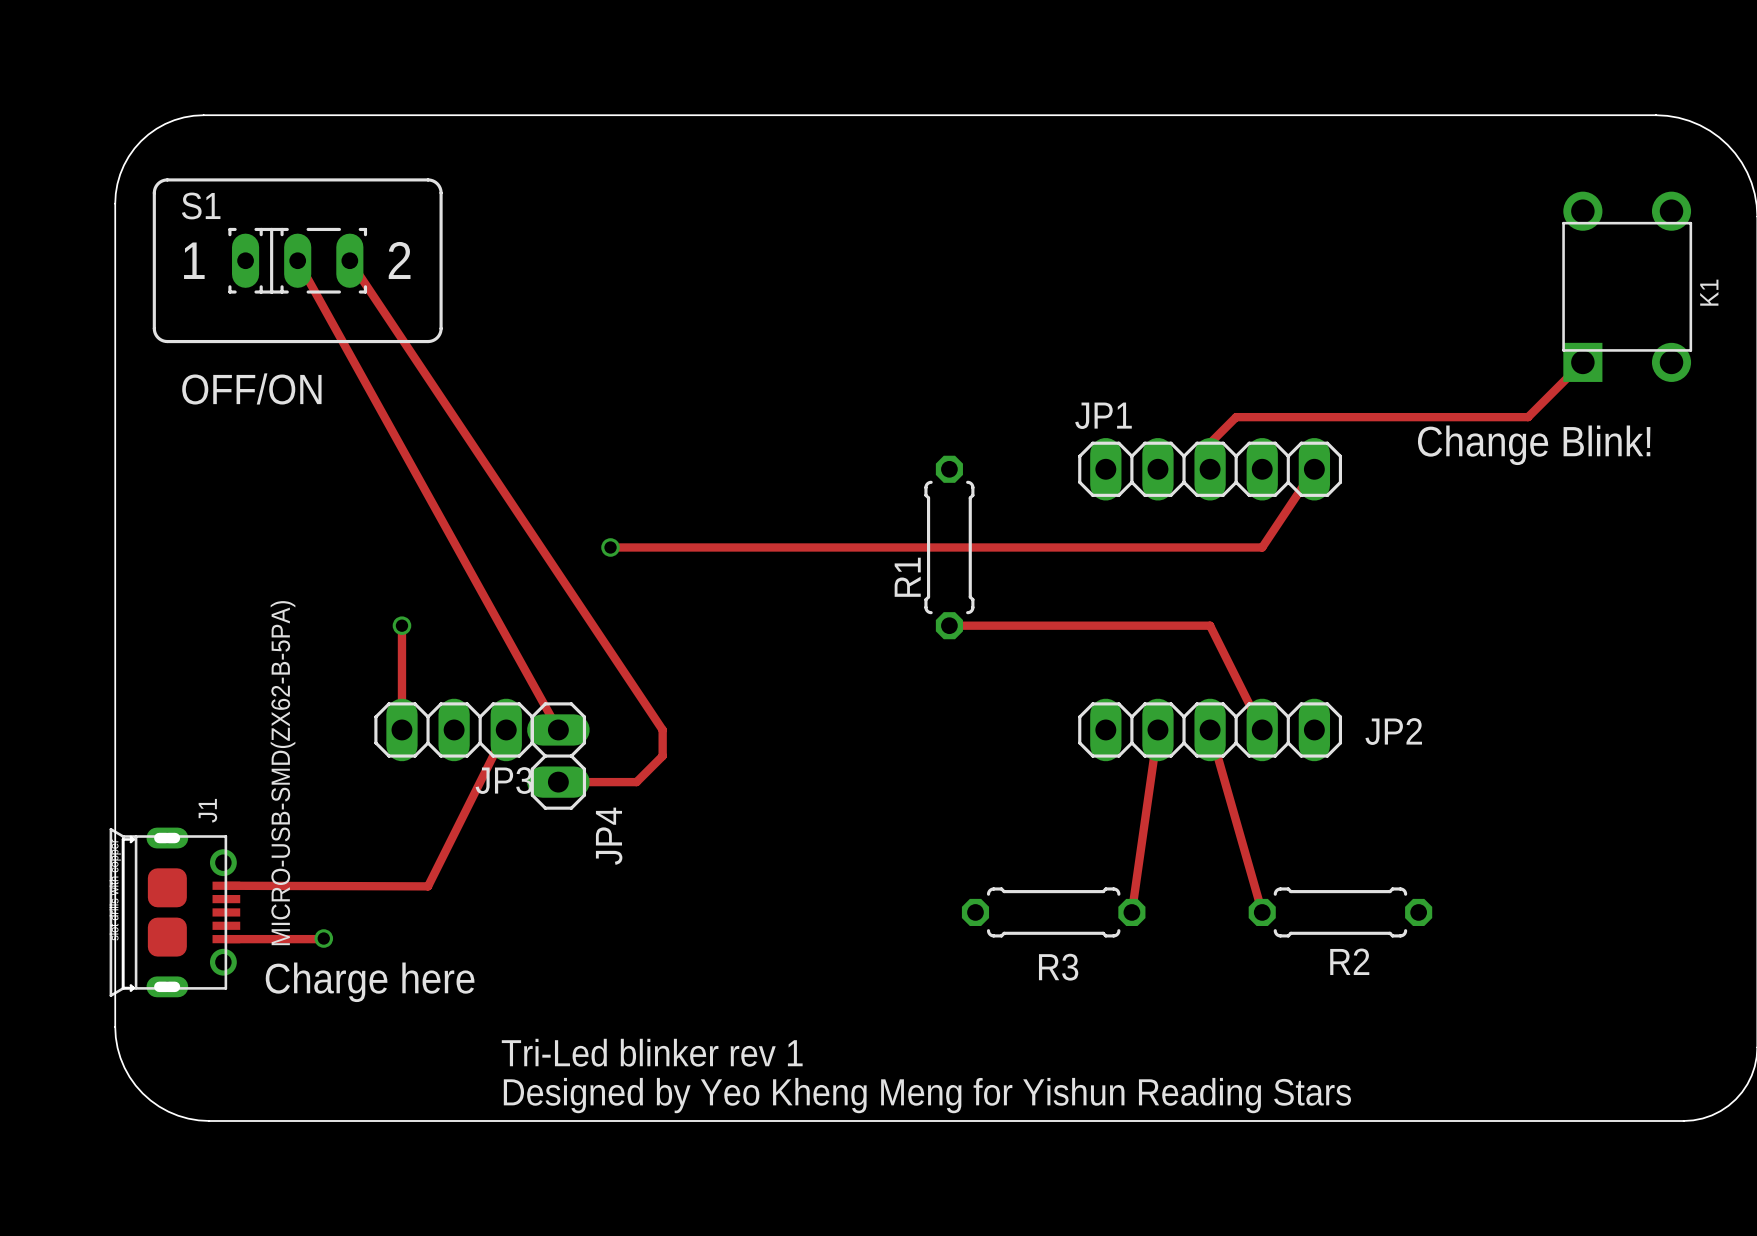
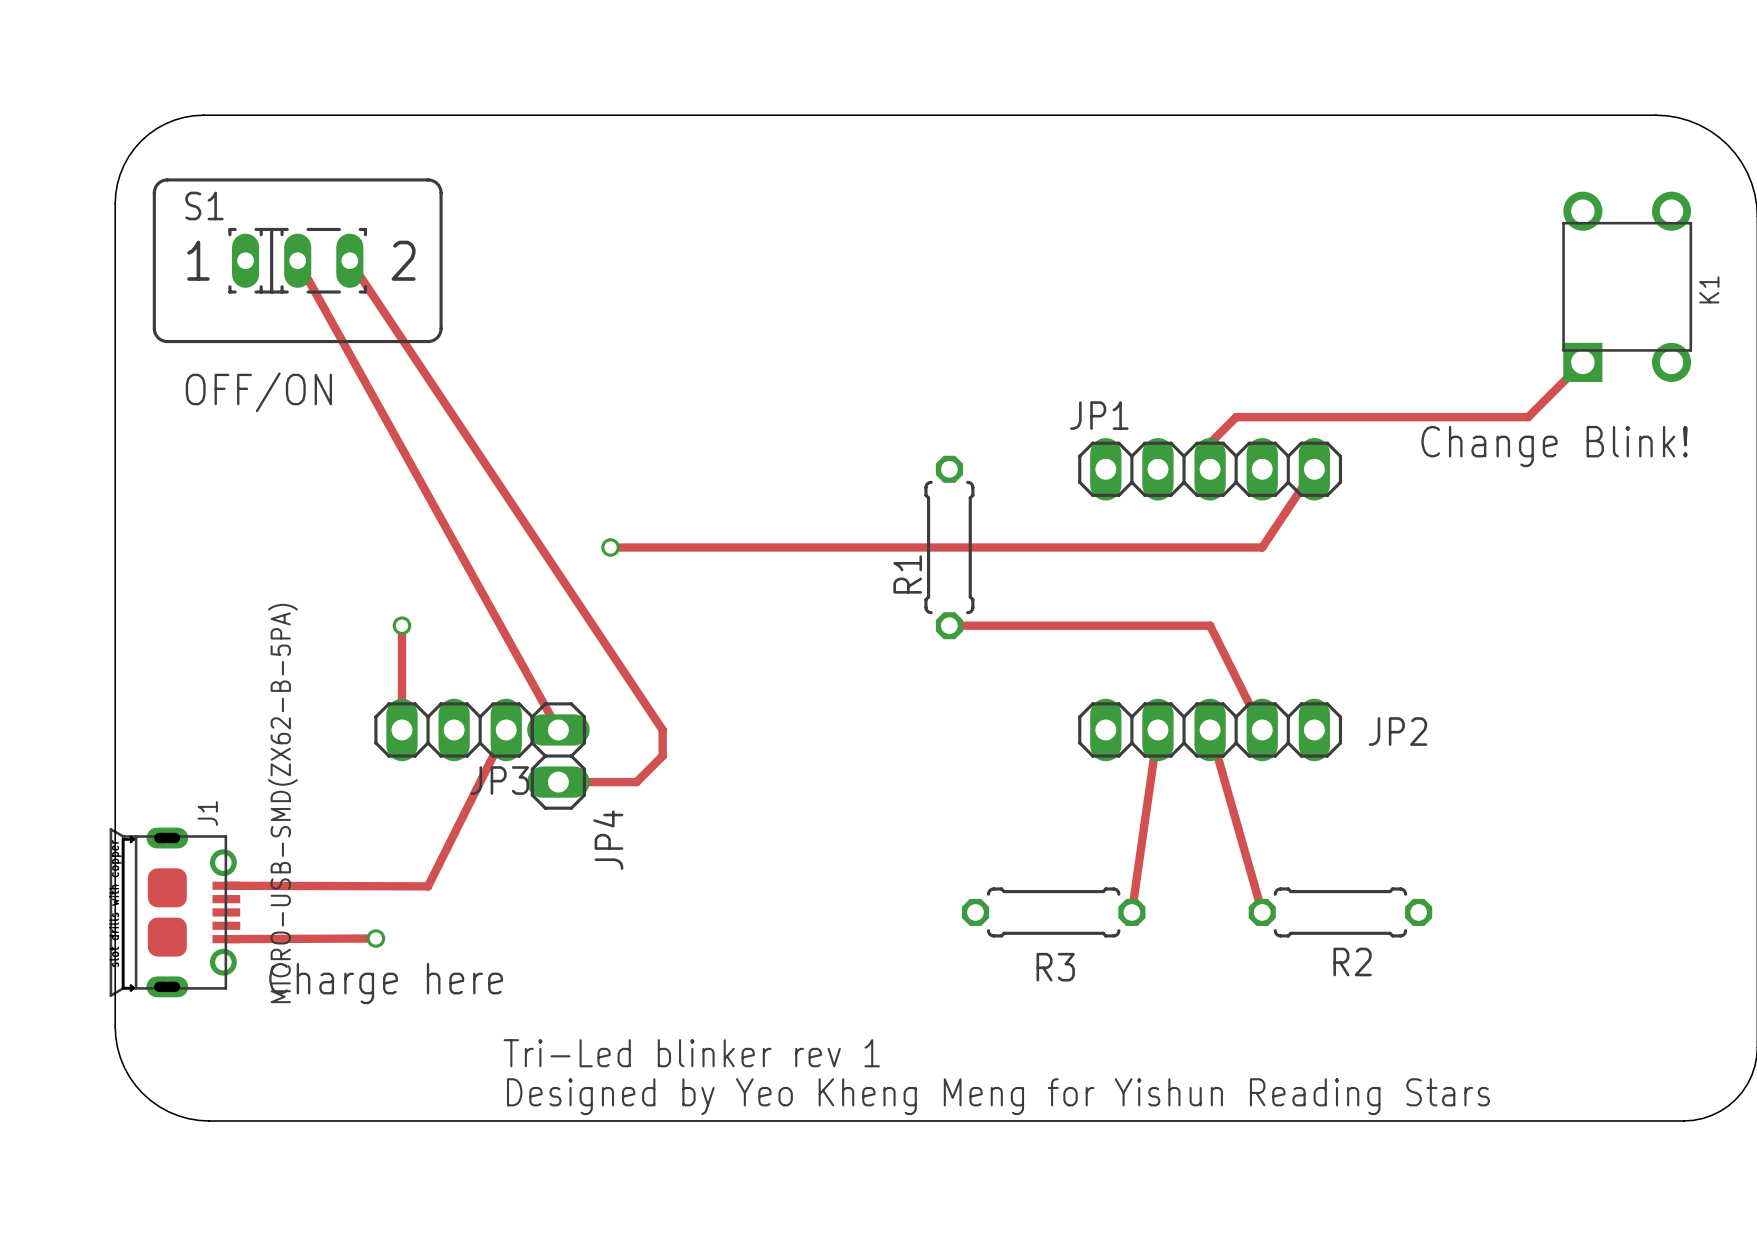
track: (323, 938) (226, 939) -> (375, 938) (226, 939)
via position: (323, 938) -> (375, 938)

